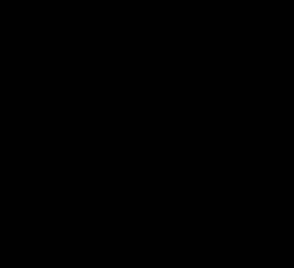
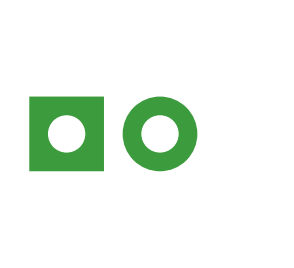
part: none -> (113, 133)

